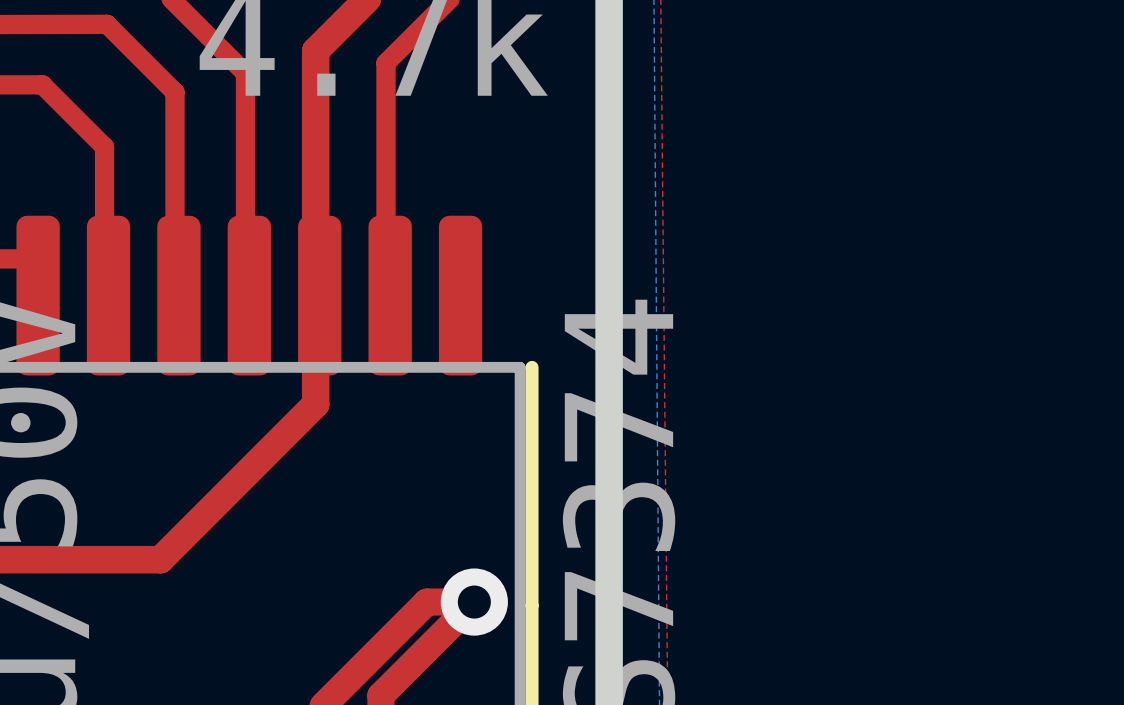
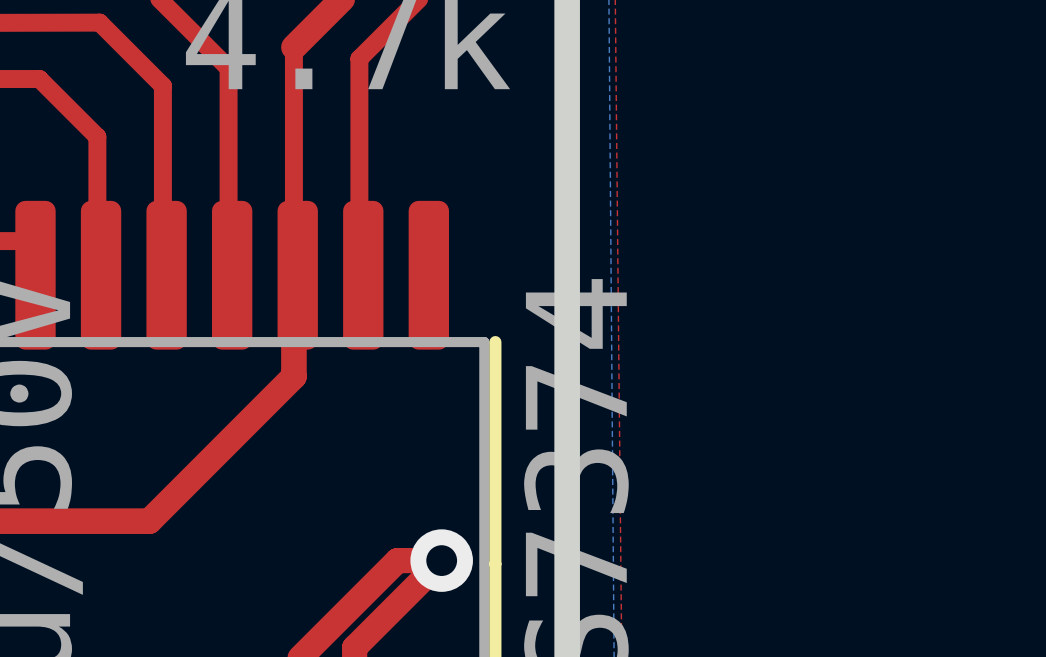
top track width: thick (315, 50) (315, 258) -> thin (293, 47) (293, 241)

